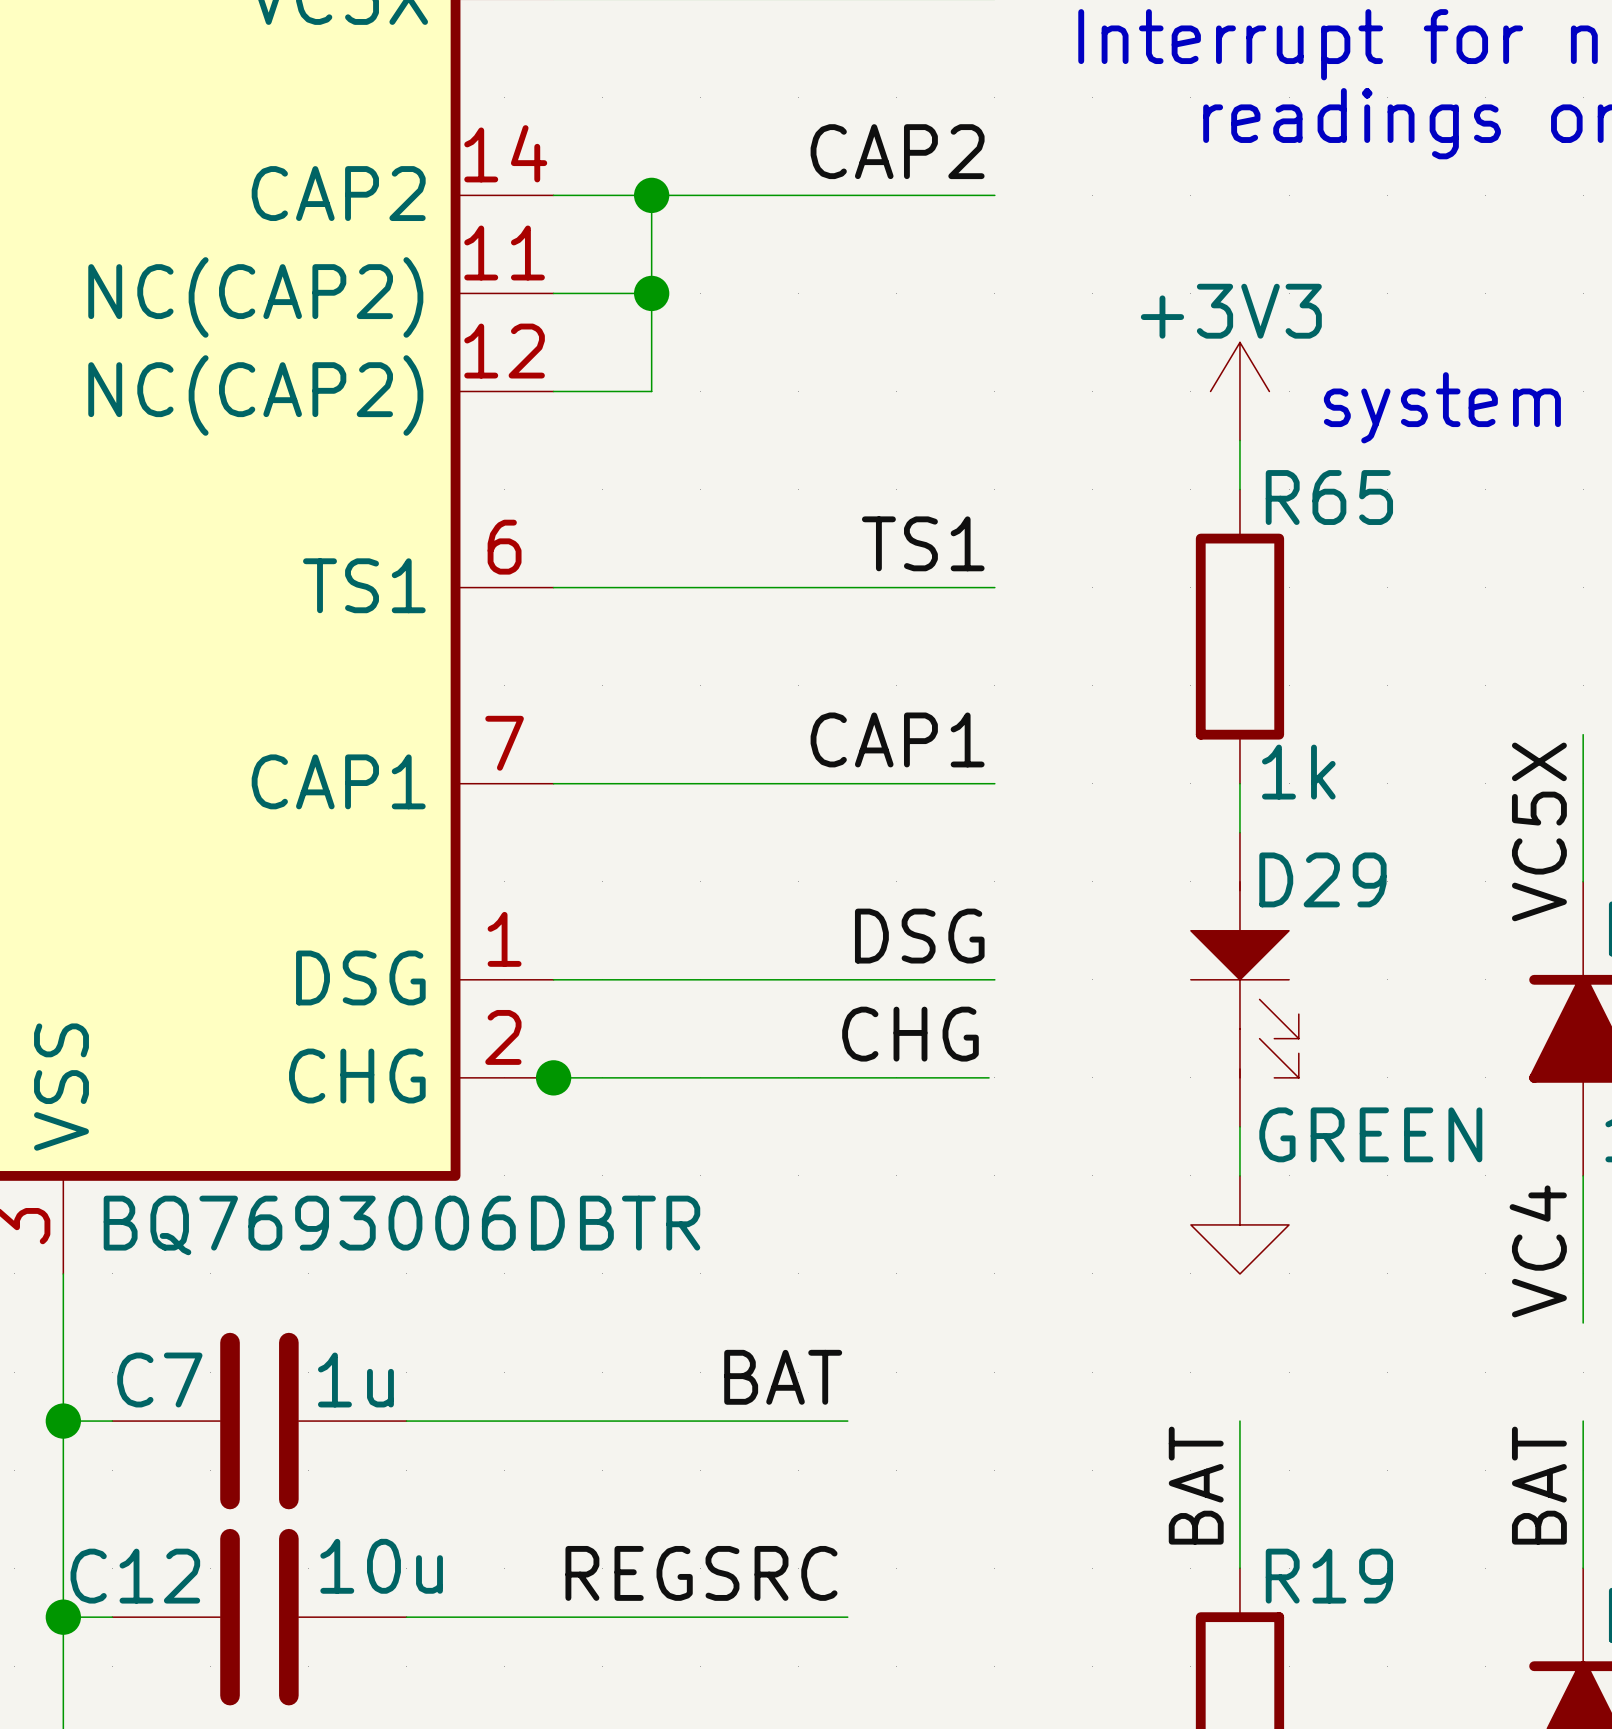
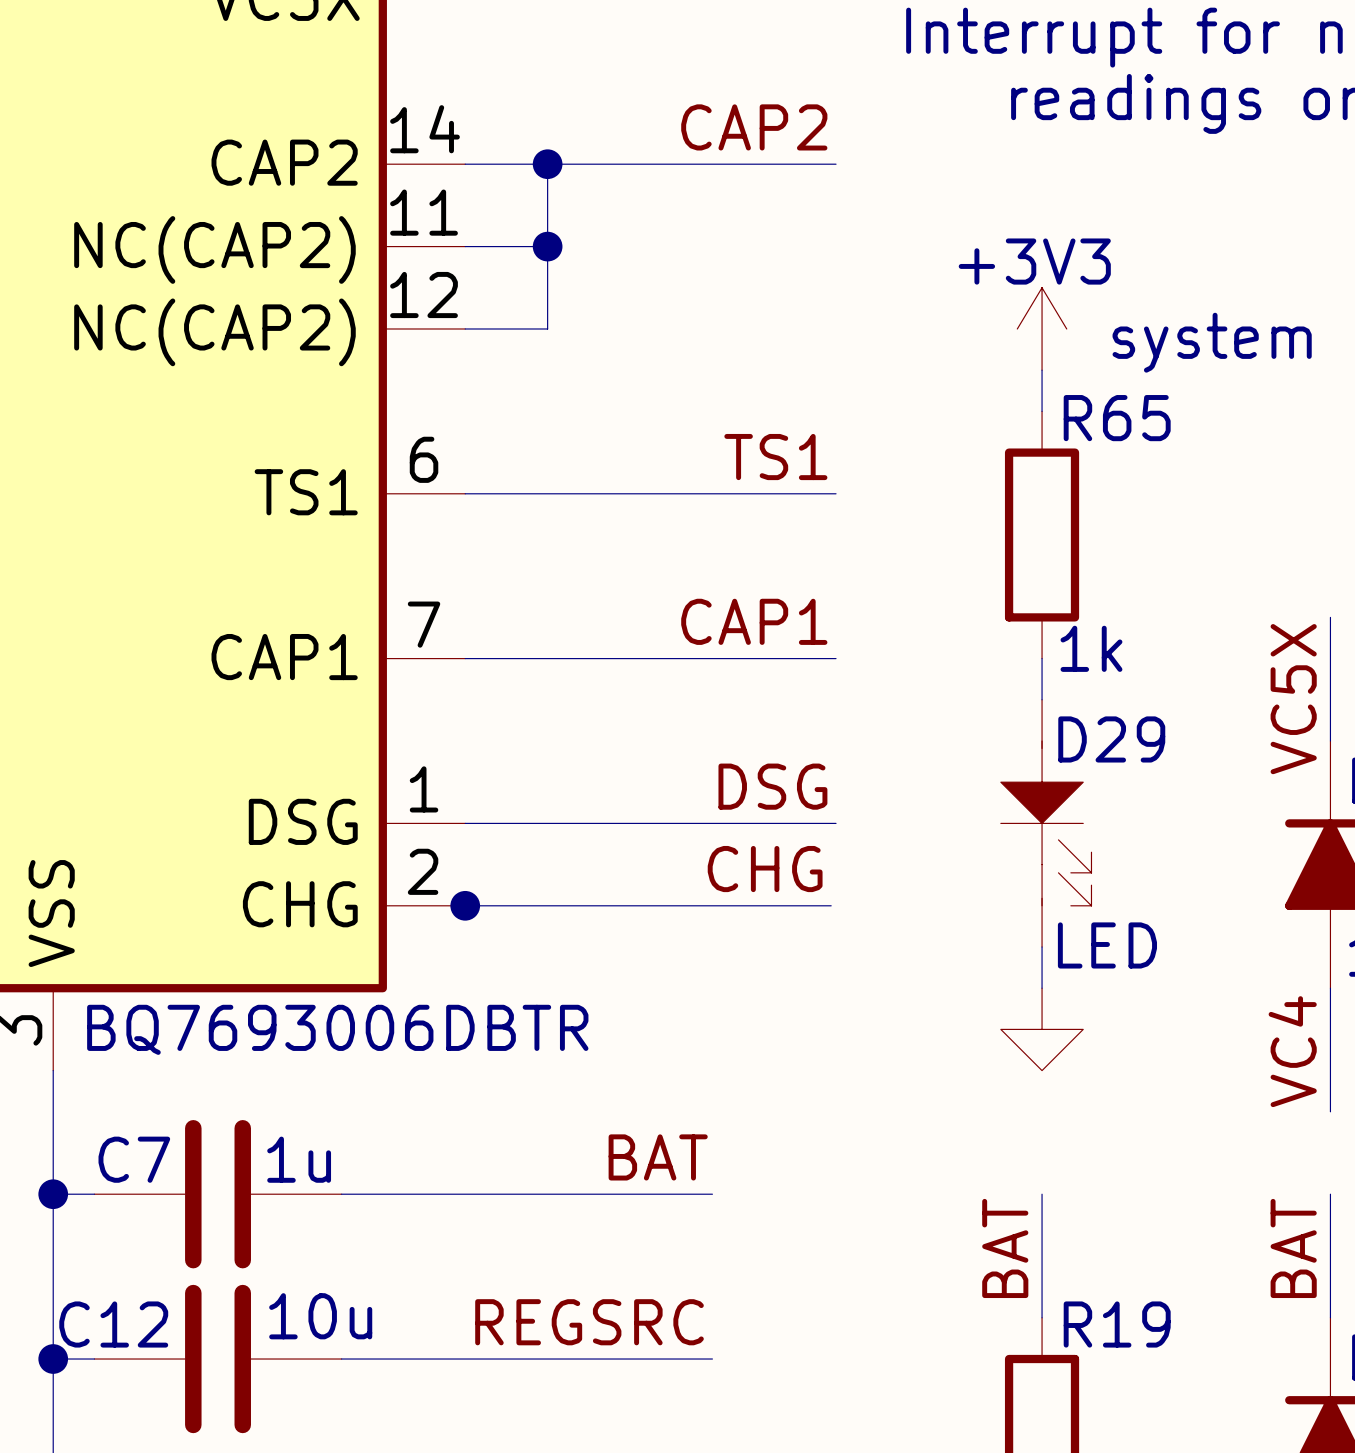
D29 value: GREEN (1370, 1134) -> LED (1107, 945)

